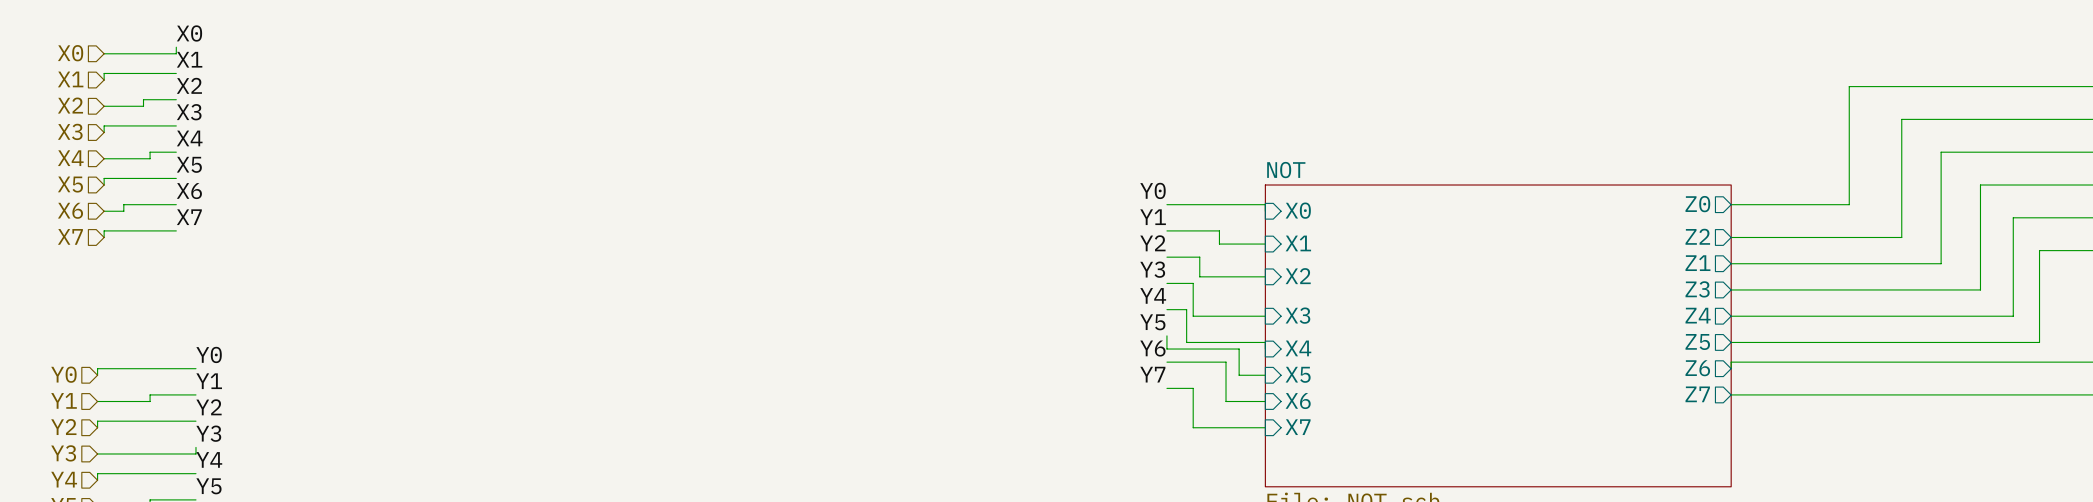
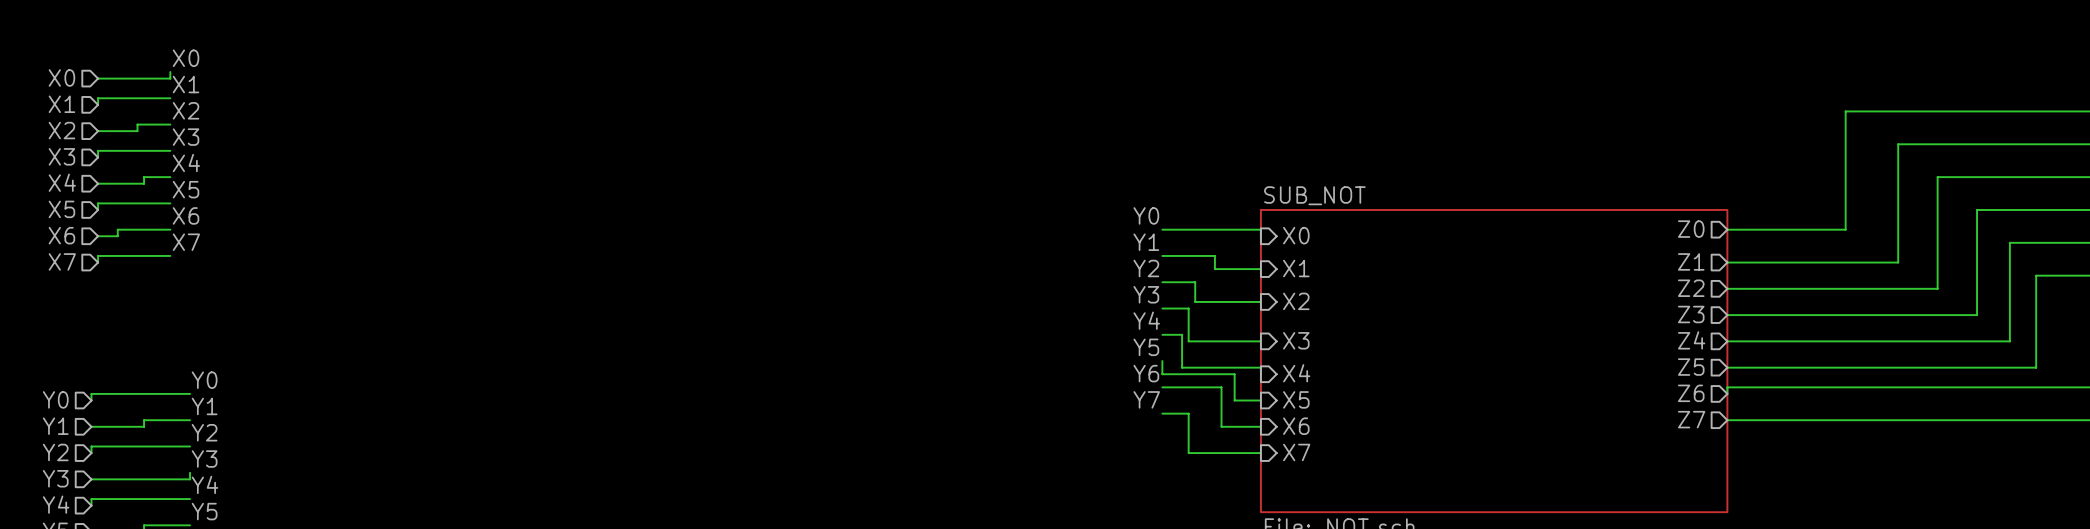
sheet NOT name: NOT (1286, 170) -> SUB_NOT (1314, 195)
sheet pin: Z2 (1697, 236) -> Z1 (1691, 261)
sheet pin: Z1 (1697, 263) -> Z2 (1691, 288)

